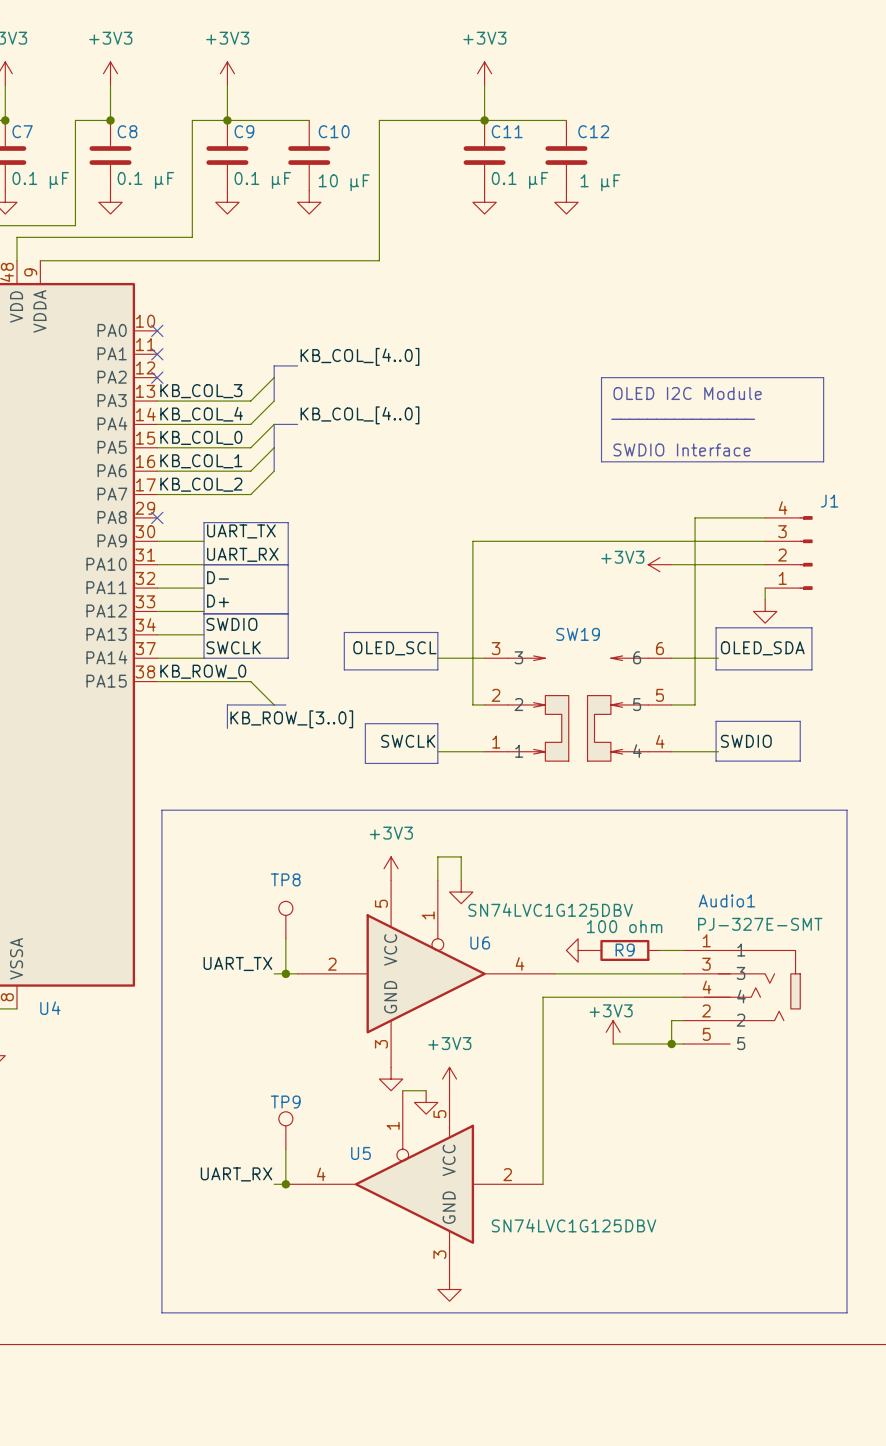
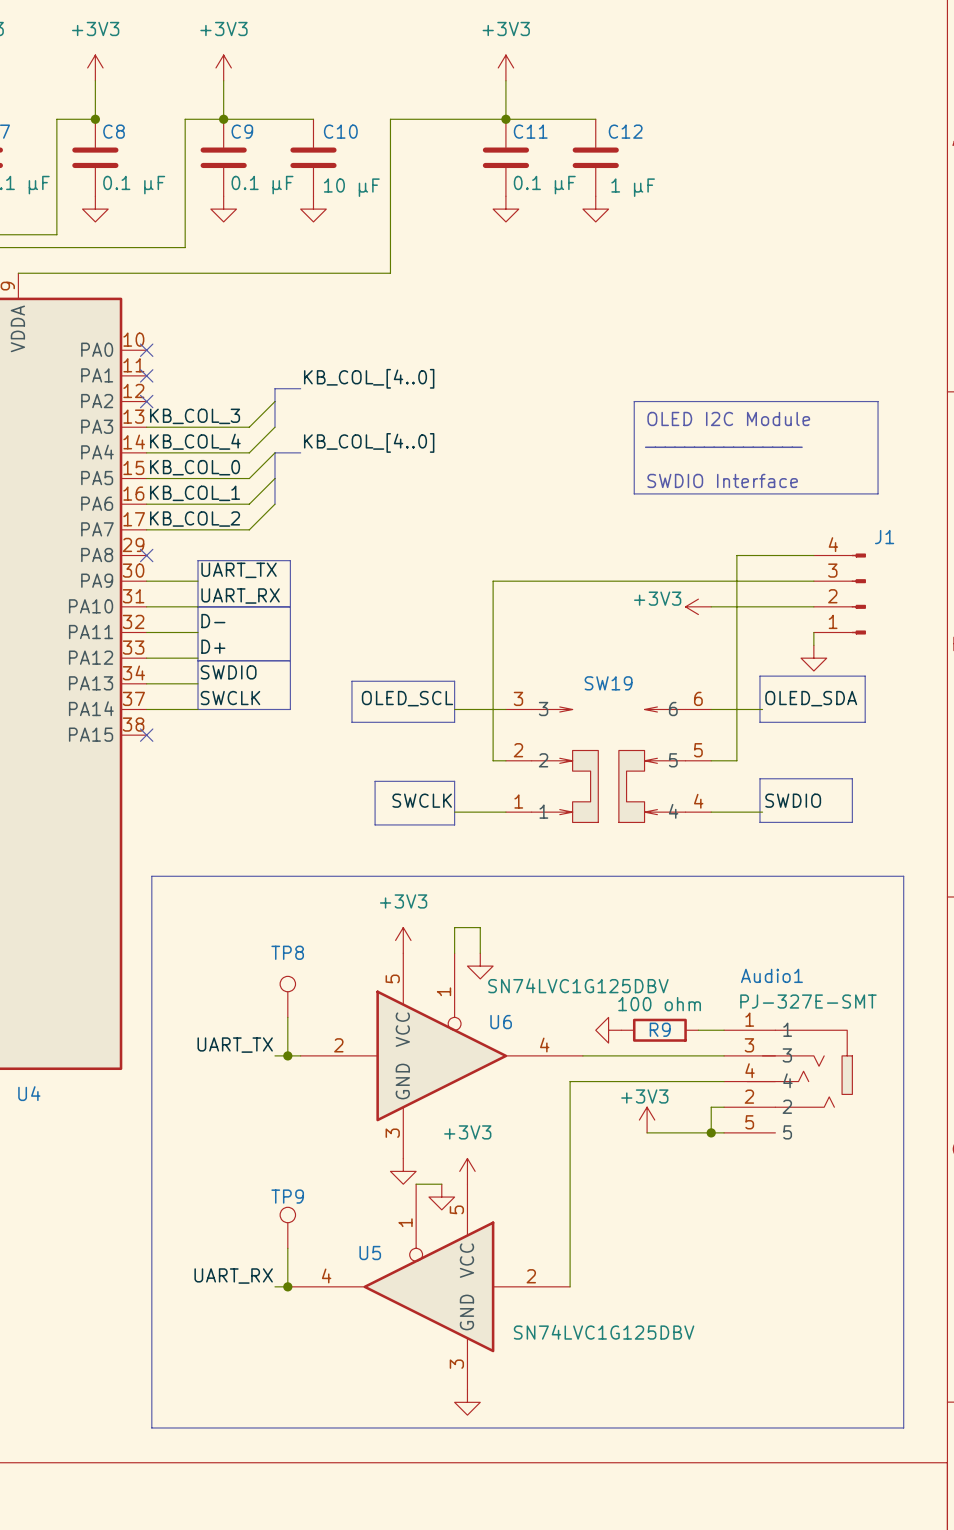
label: KB_ROW_0 (203, 671) -> none
wire: (157, 681) (250, 681) (274, 704) -> none
no-connect mark: none -> (146, 735)
bus: (285, 704) (227, 704) (227, 728) -> none
label: KB_ROW_[3..0] (291, 719) -> none

